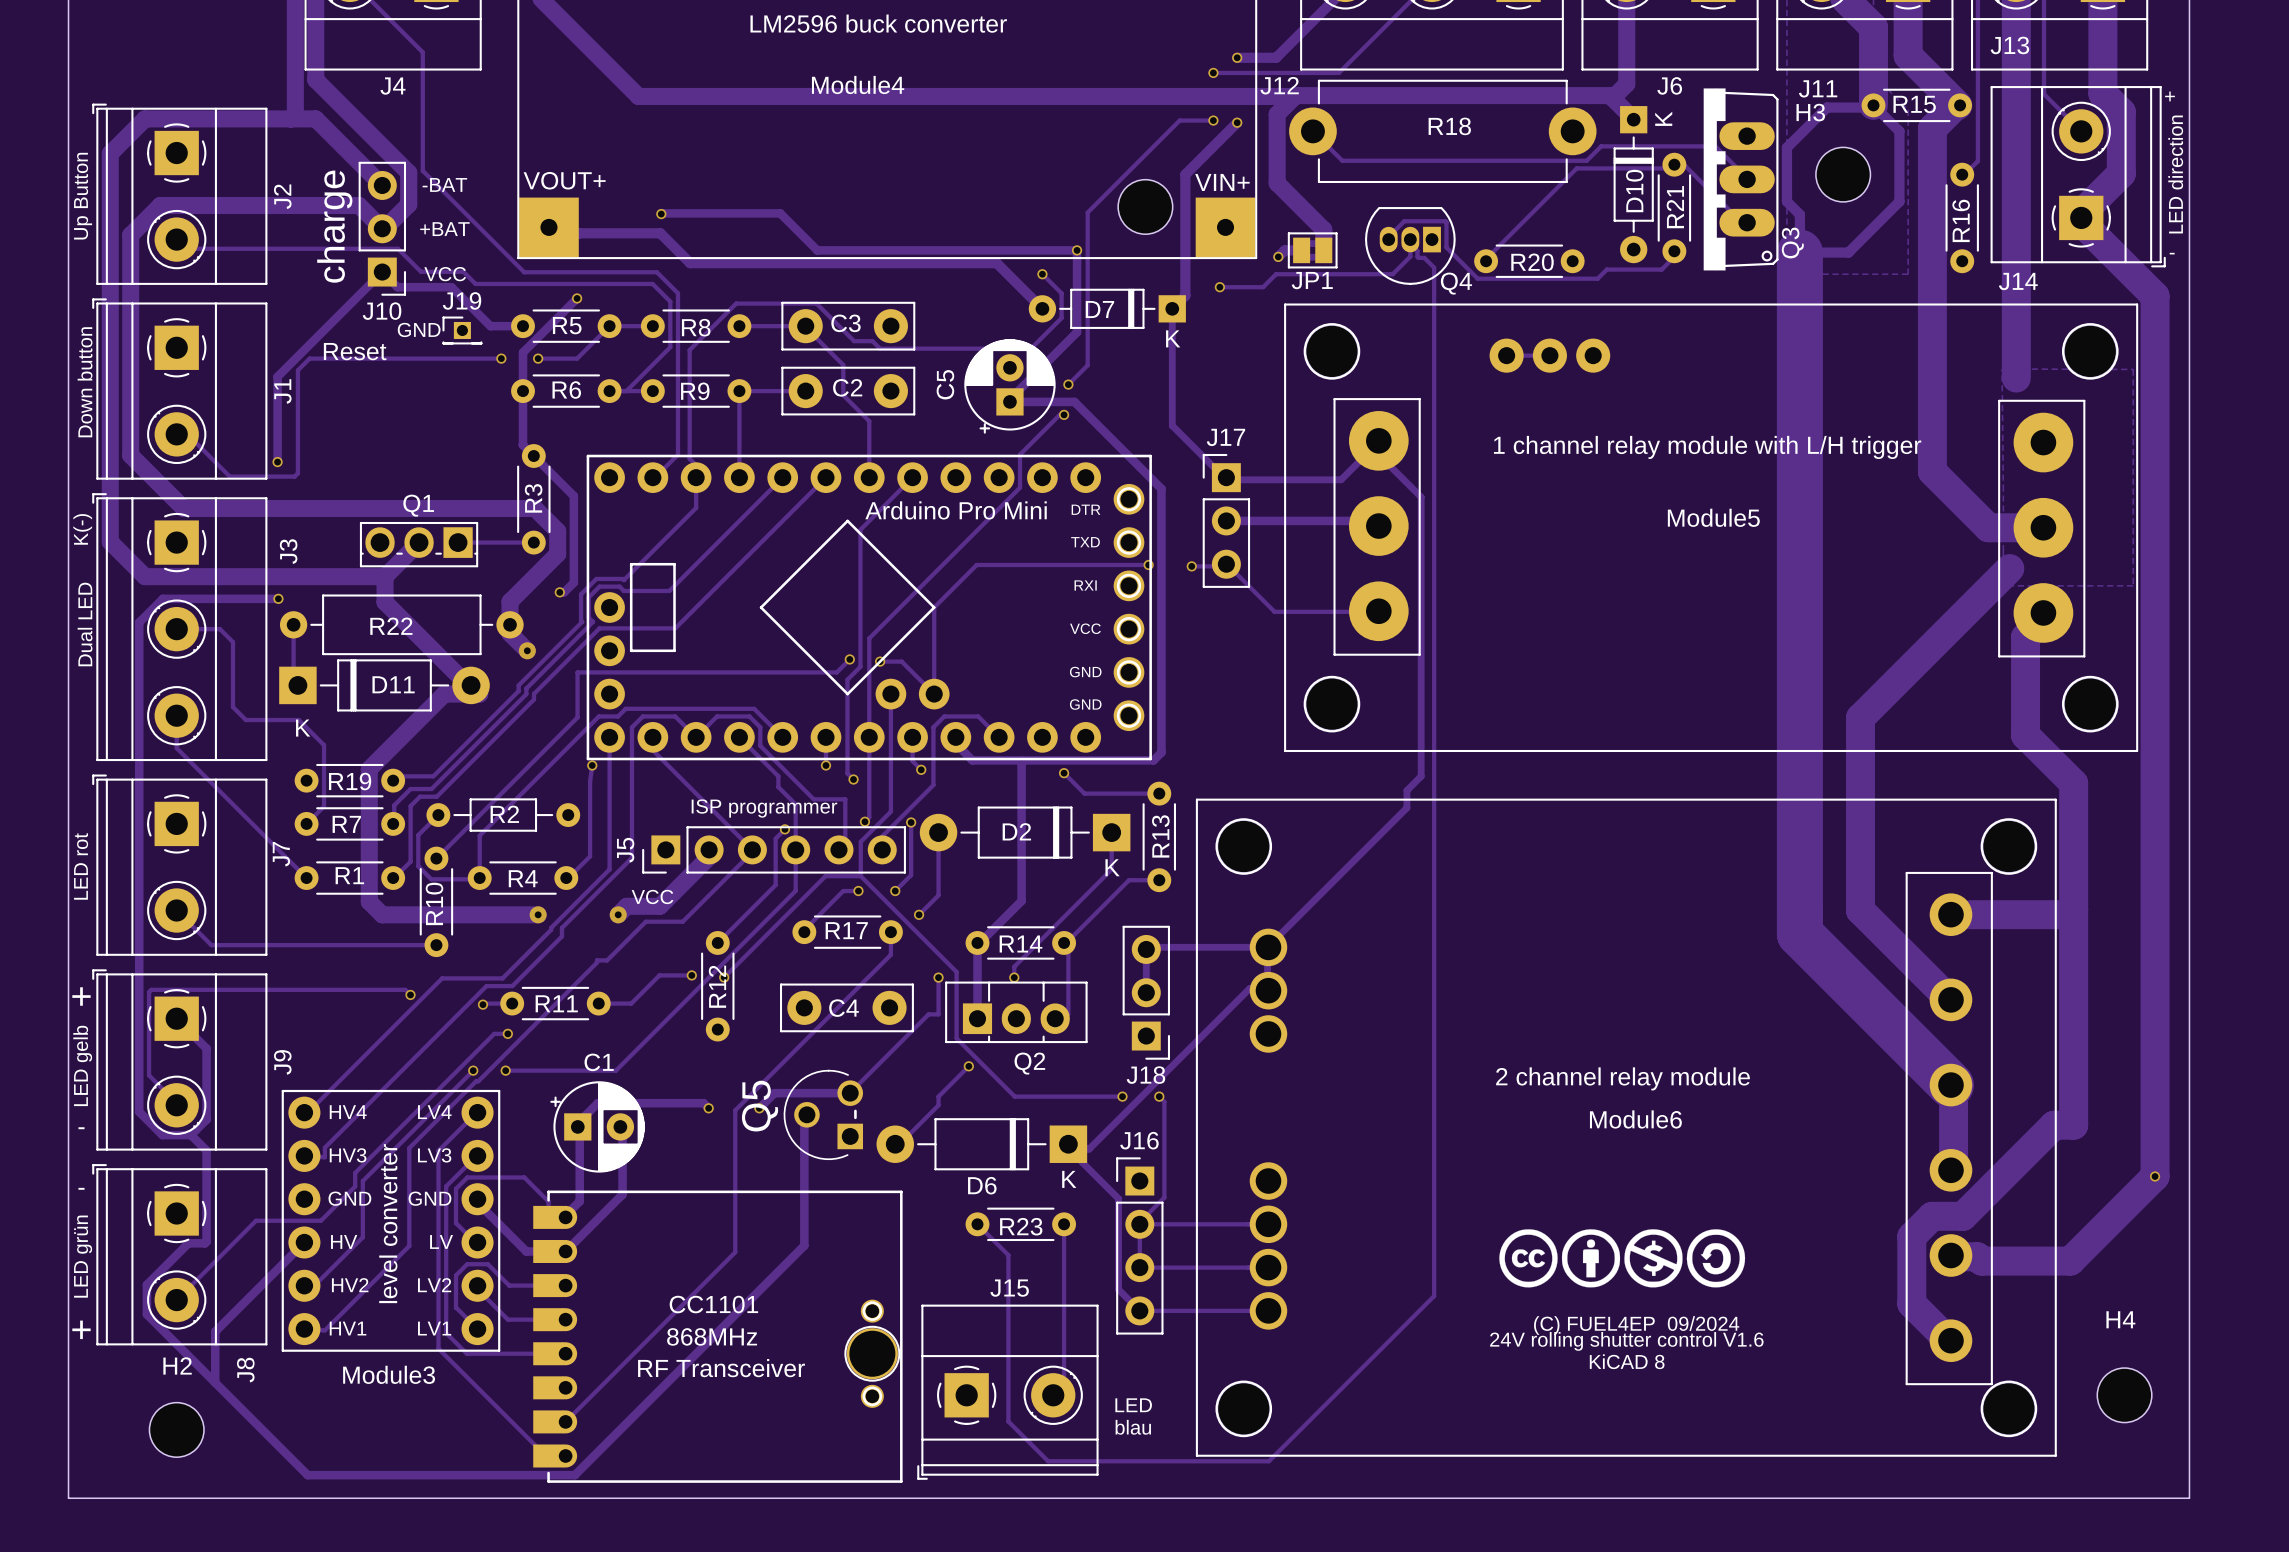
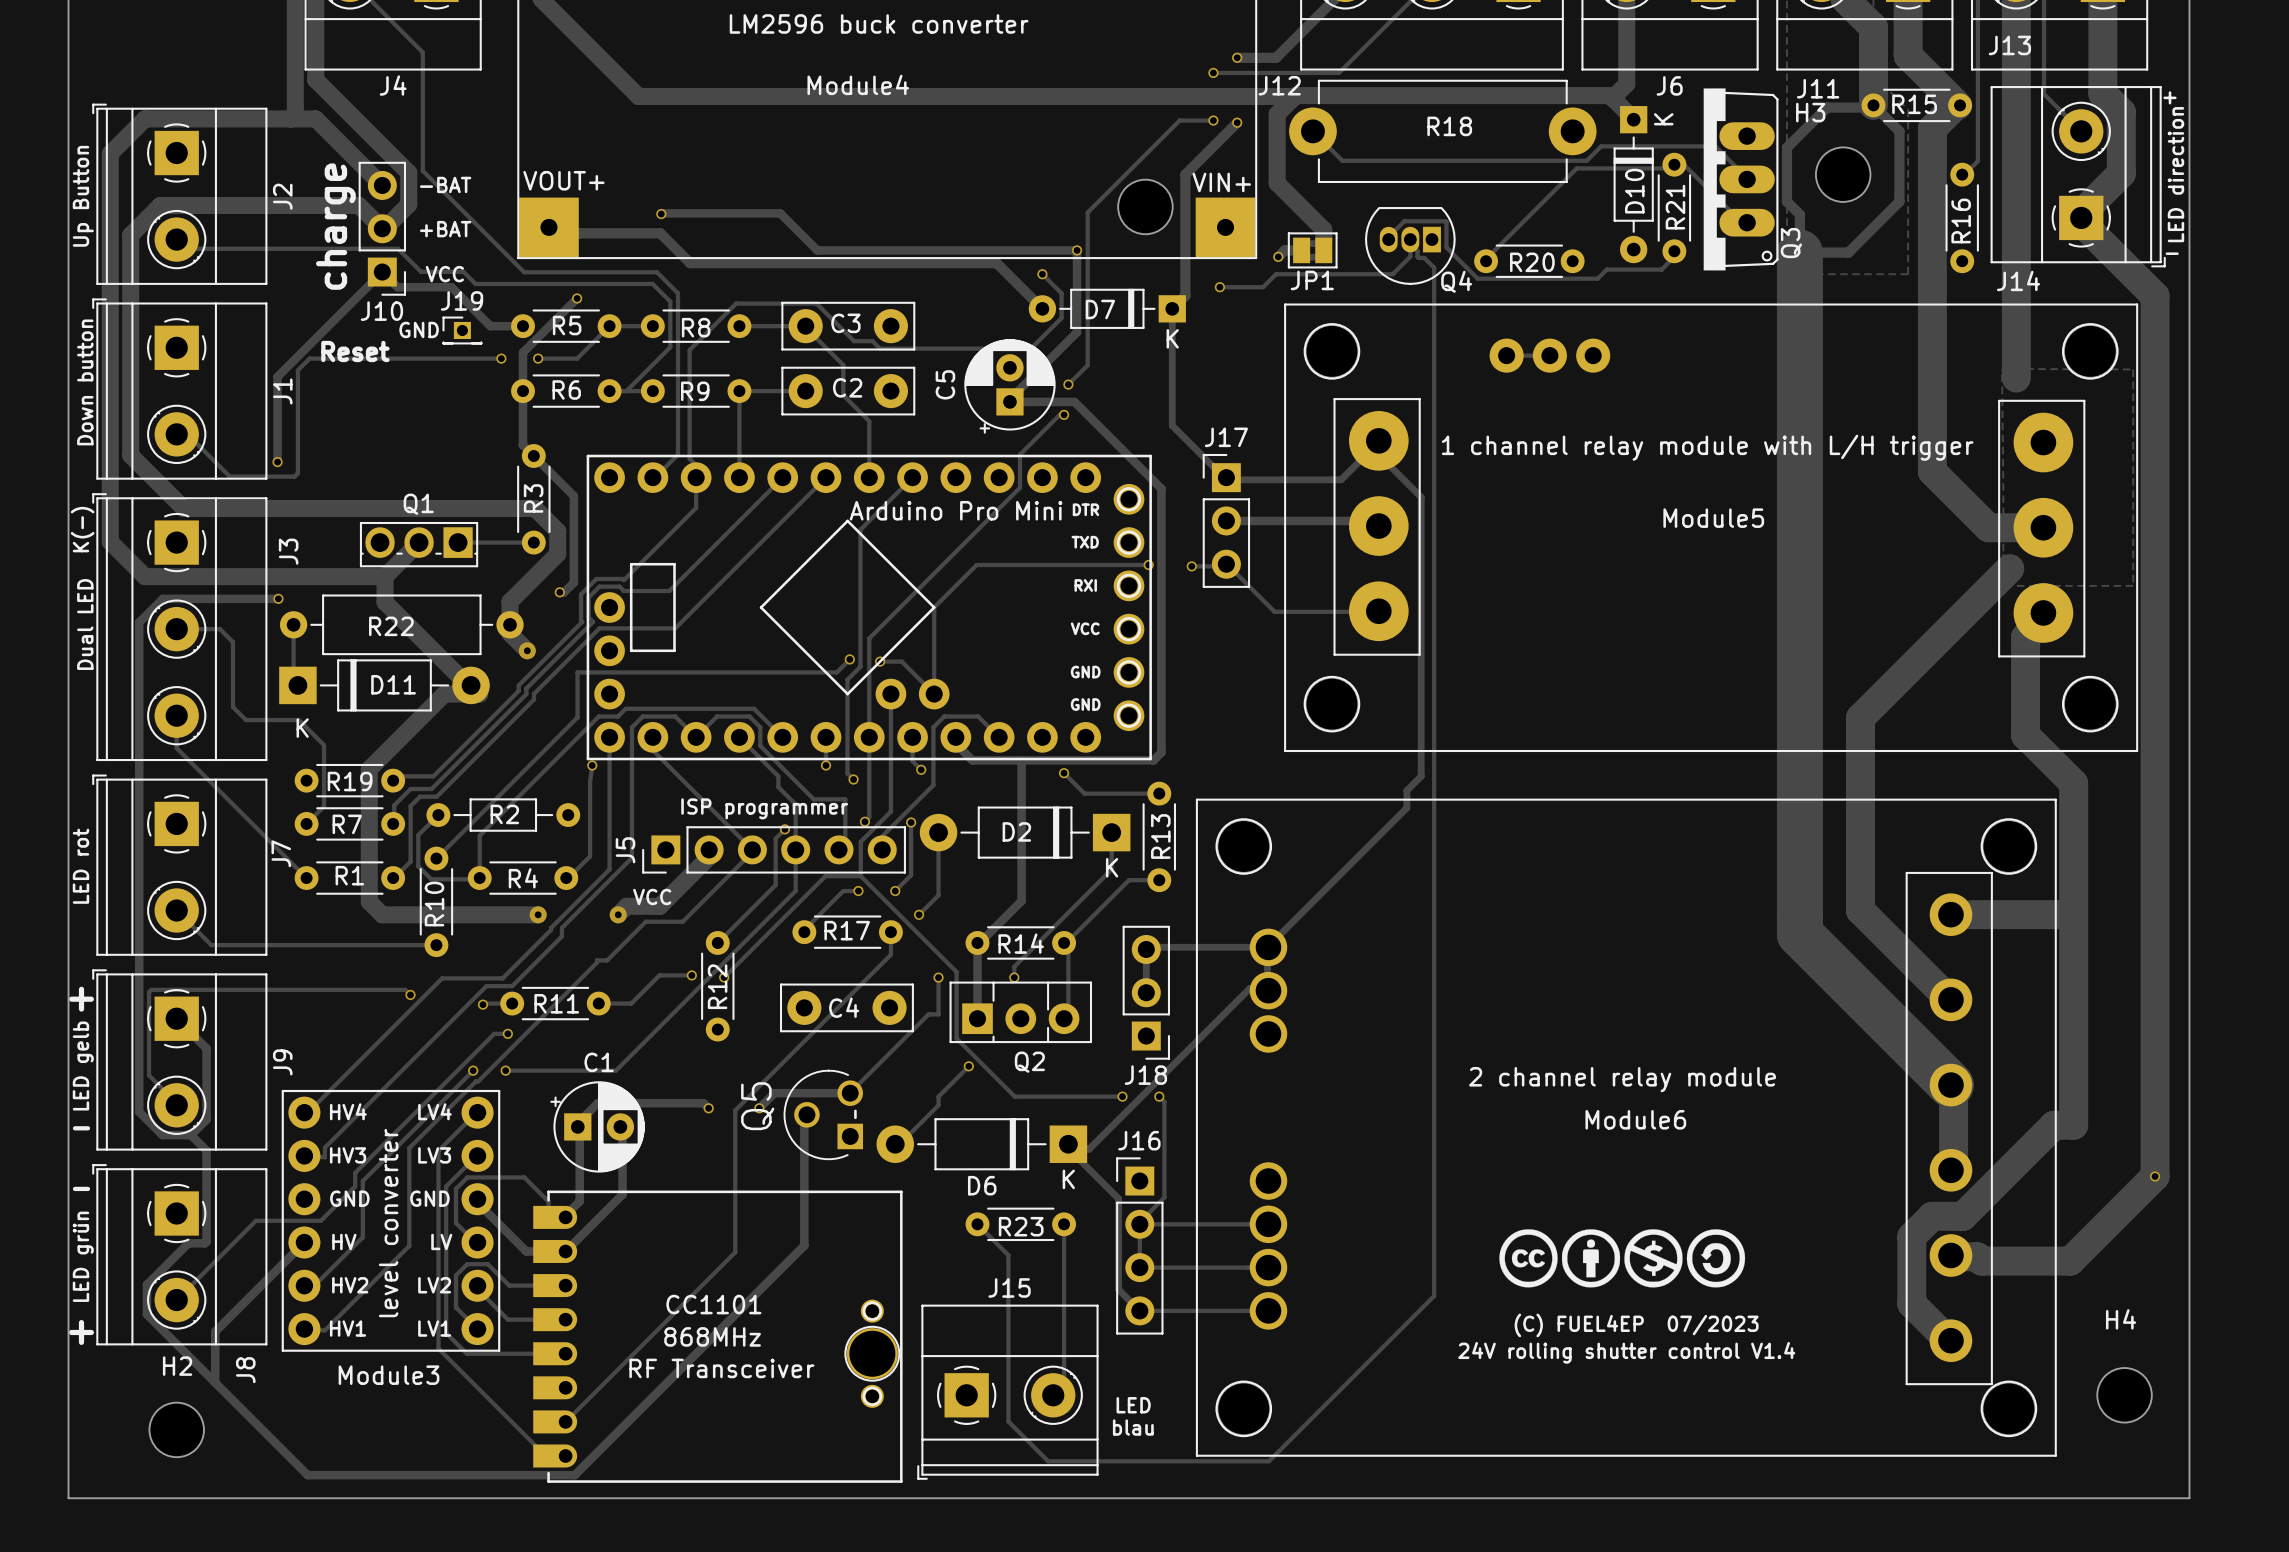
Q2 footprint: [945, 981, 1088, 1044] -> [949, 981, 1093, 1044]
text: (C) FUEL4EP 09/2024 (1636, 1325) -> (C) FUEL4EP 07/2023 (1636, 1325)
text: 24V rolling shutter control V1.6 (1626, 1341) -> 24V rolling shutter control V1.4 (1626, 1352)
text: KiCAD 8 (1627, 1361) -> none

